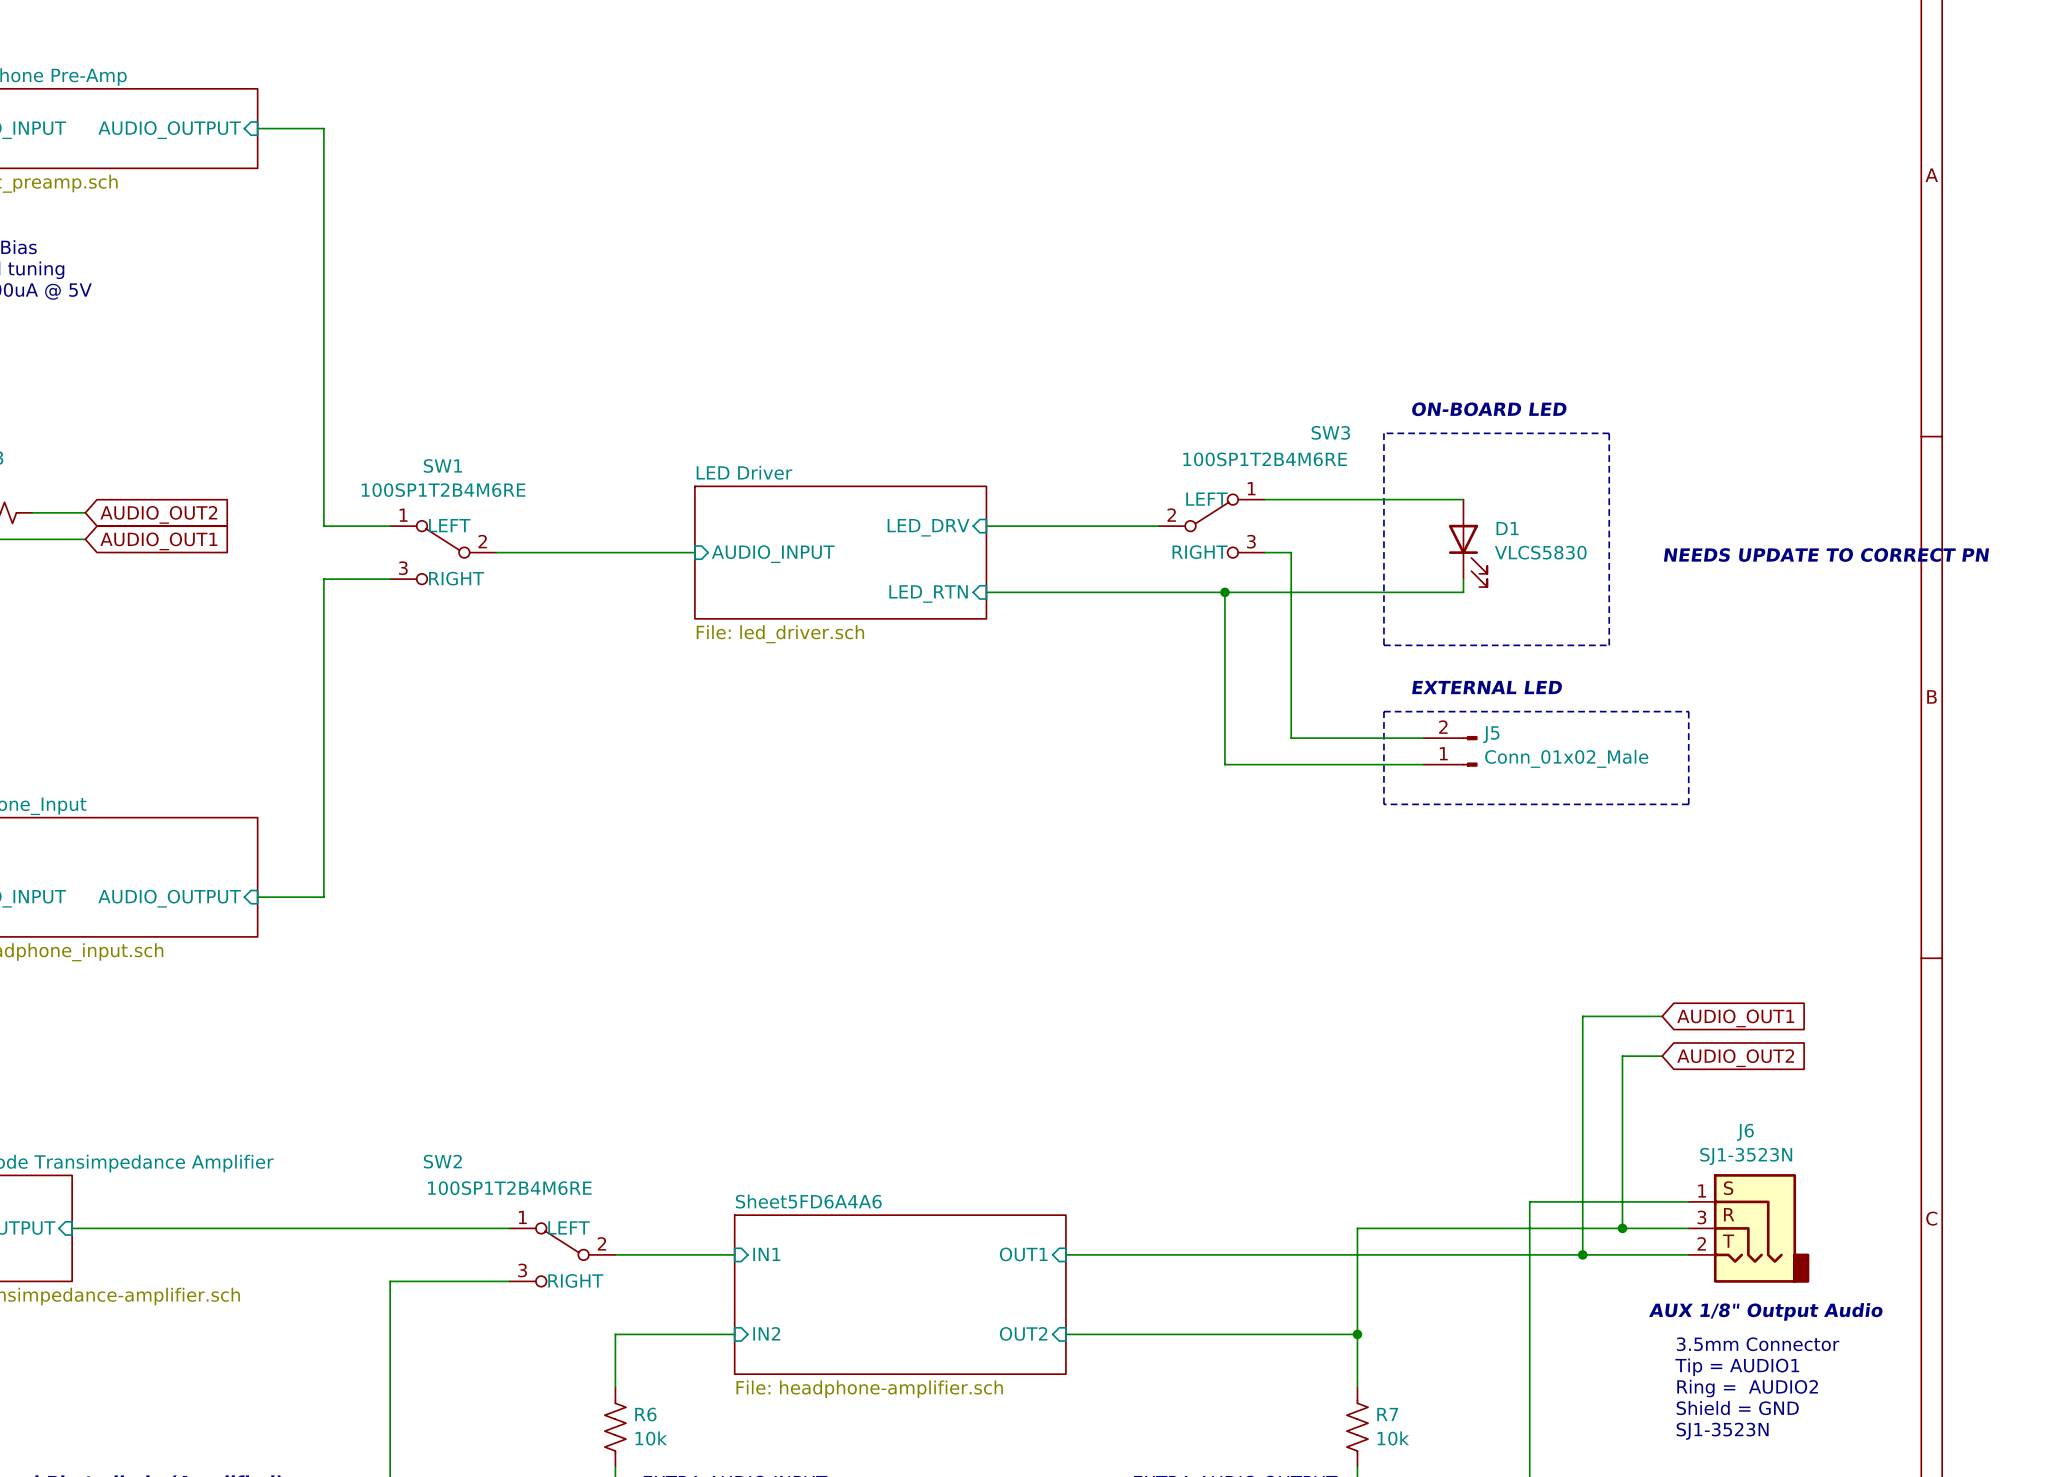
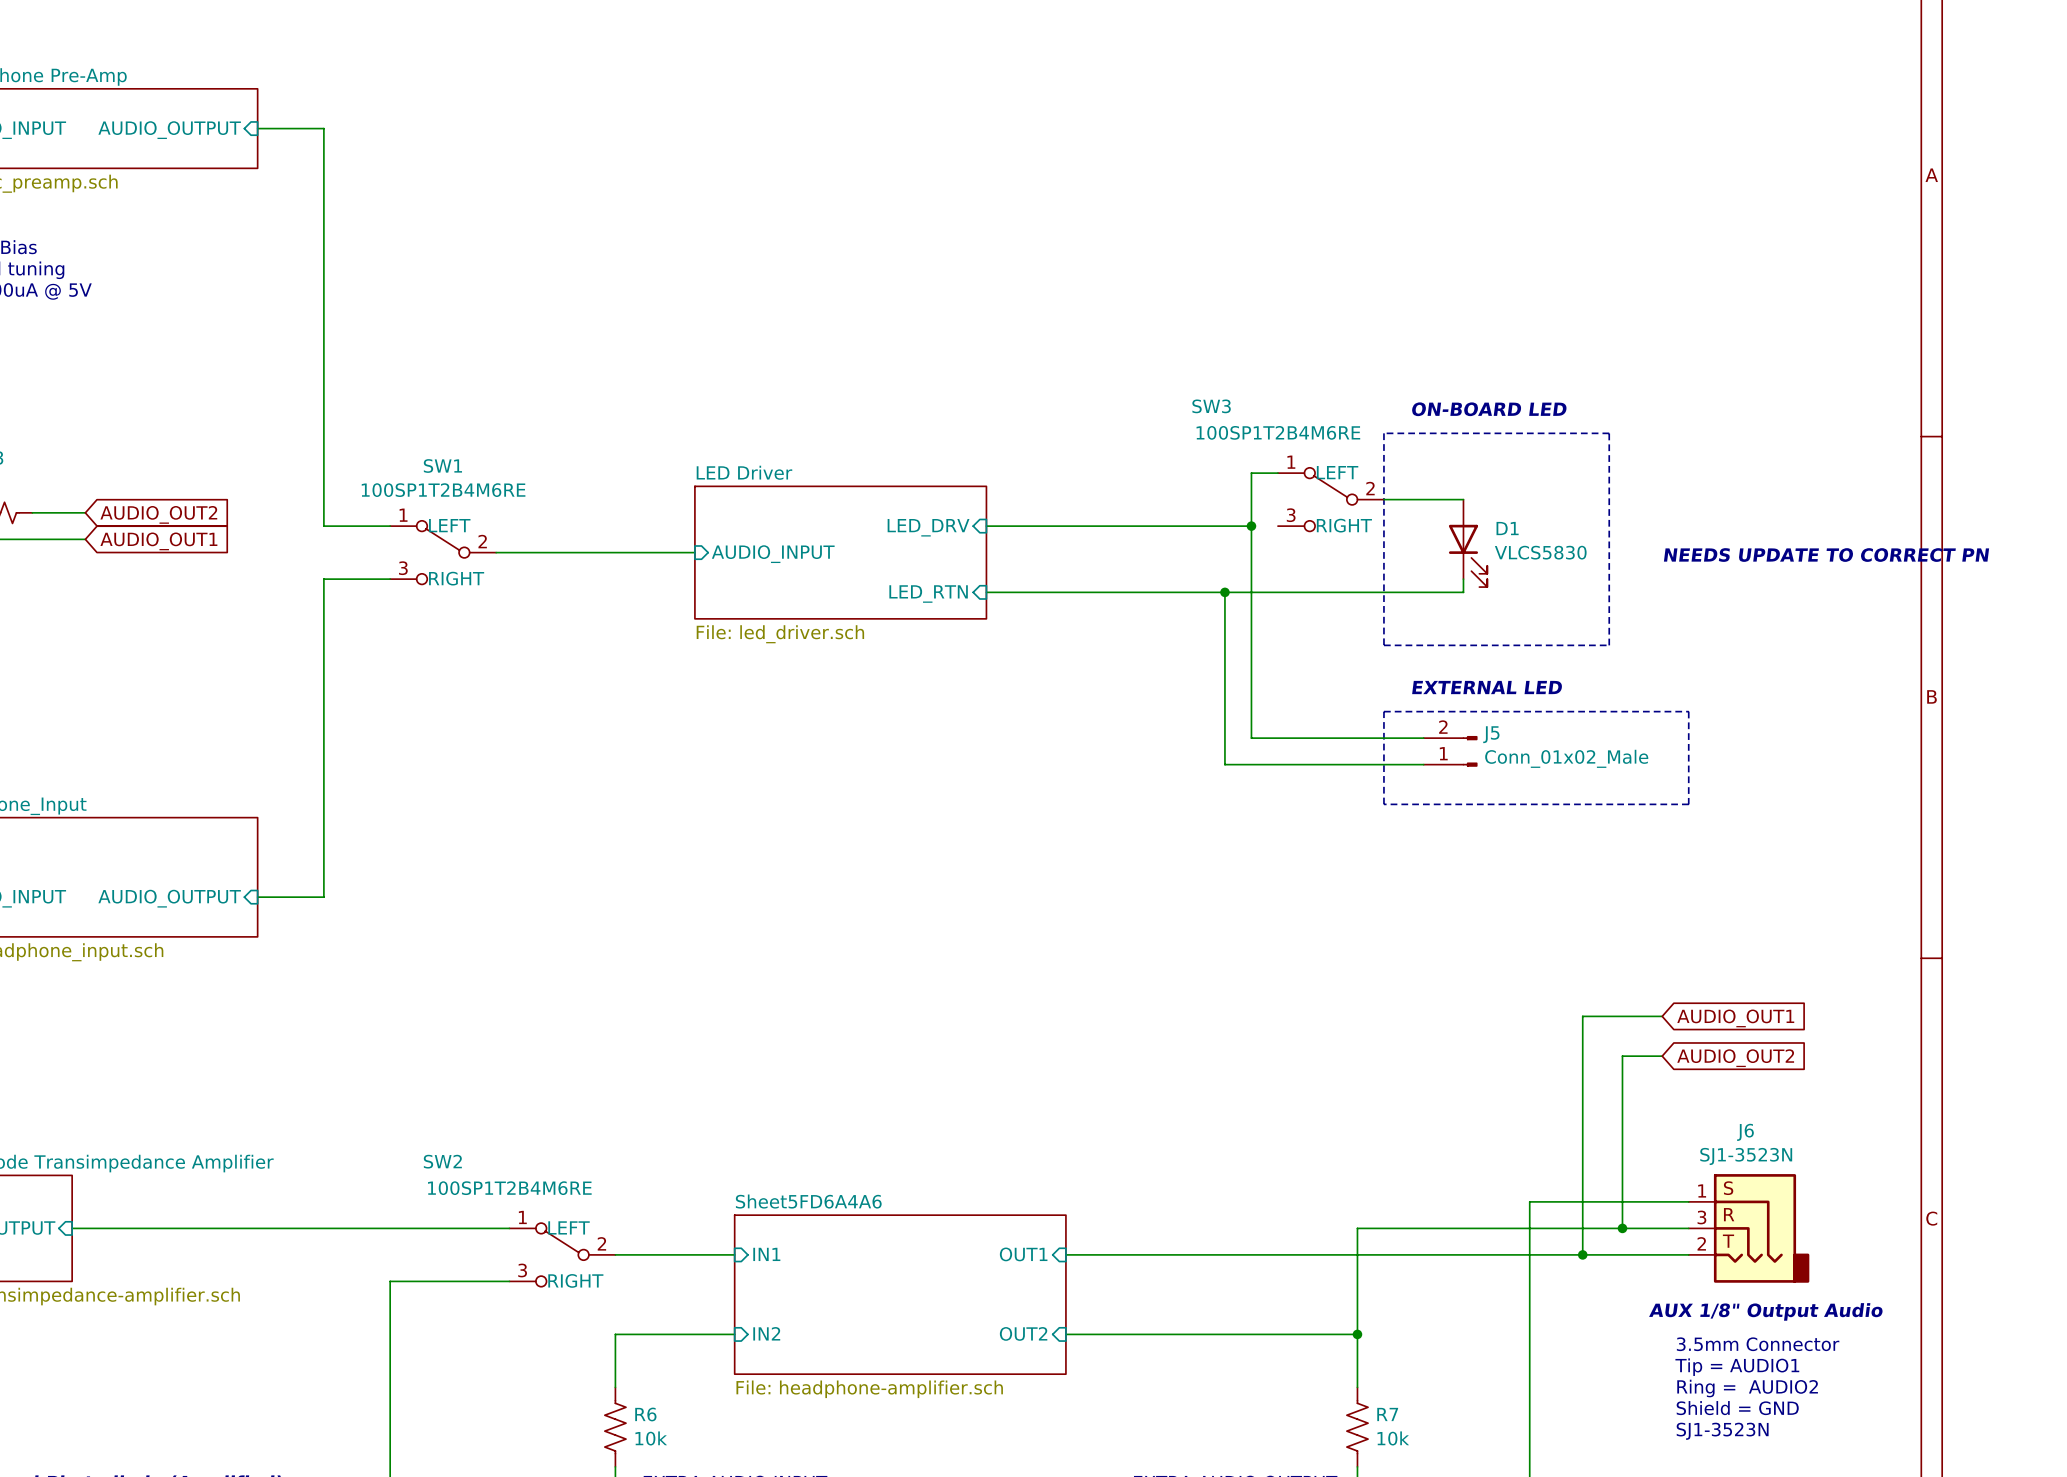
wire: (1264, 499) (1383, 499) -> none
wire: none -> (1158, 526) (1251, 526)
SW3 flip: as is (1211, 526) -> left-right (1330, 499)
SW3 position: (1211, 526) -> (1330, 499)
junction: none -> (1251, 526)
wire: (1264, 552) (1291, 552) (1291, 738) -> (1277, 473) (1251, 473) (1251, 738) (1291, 738)

